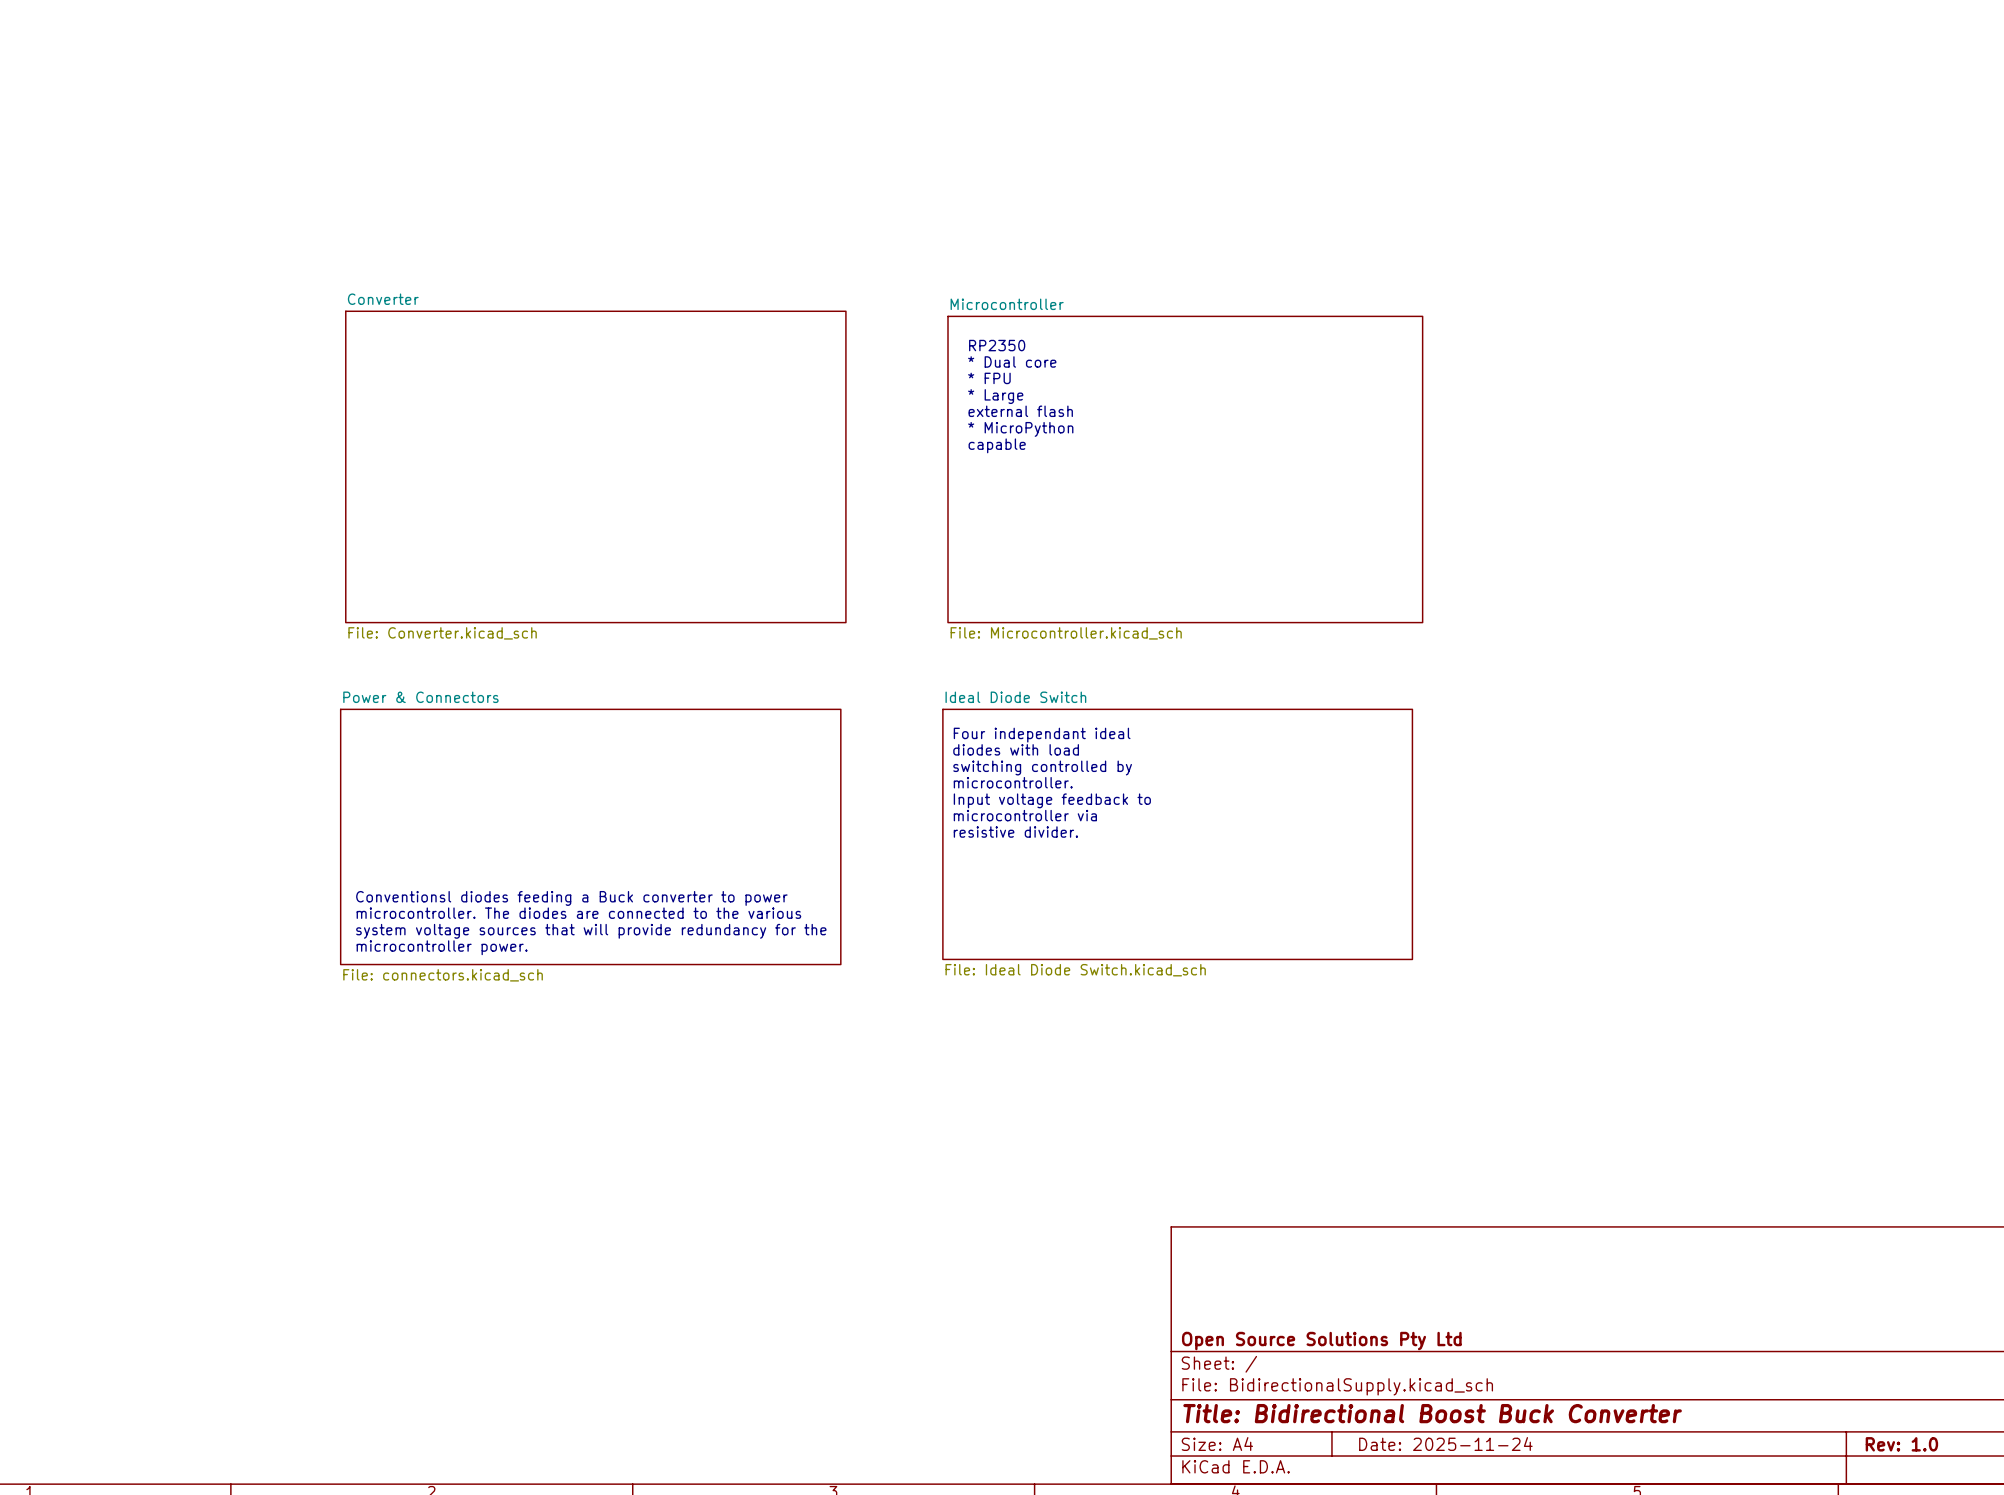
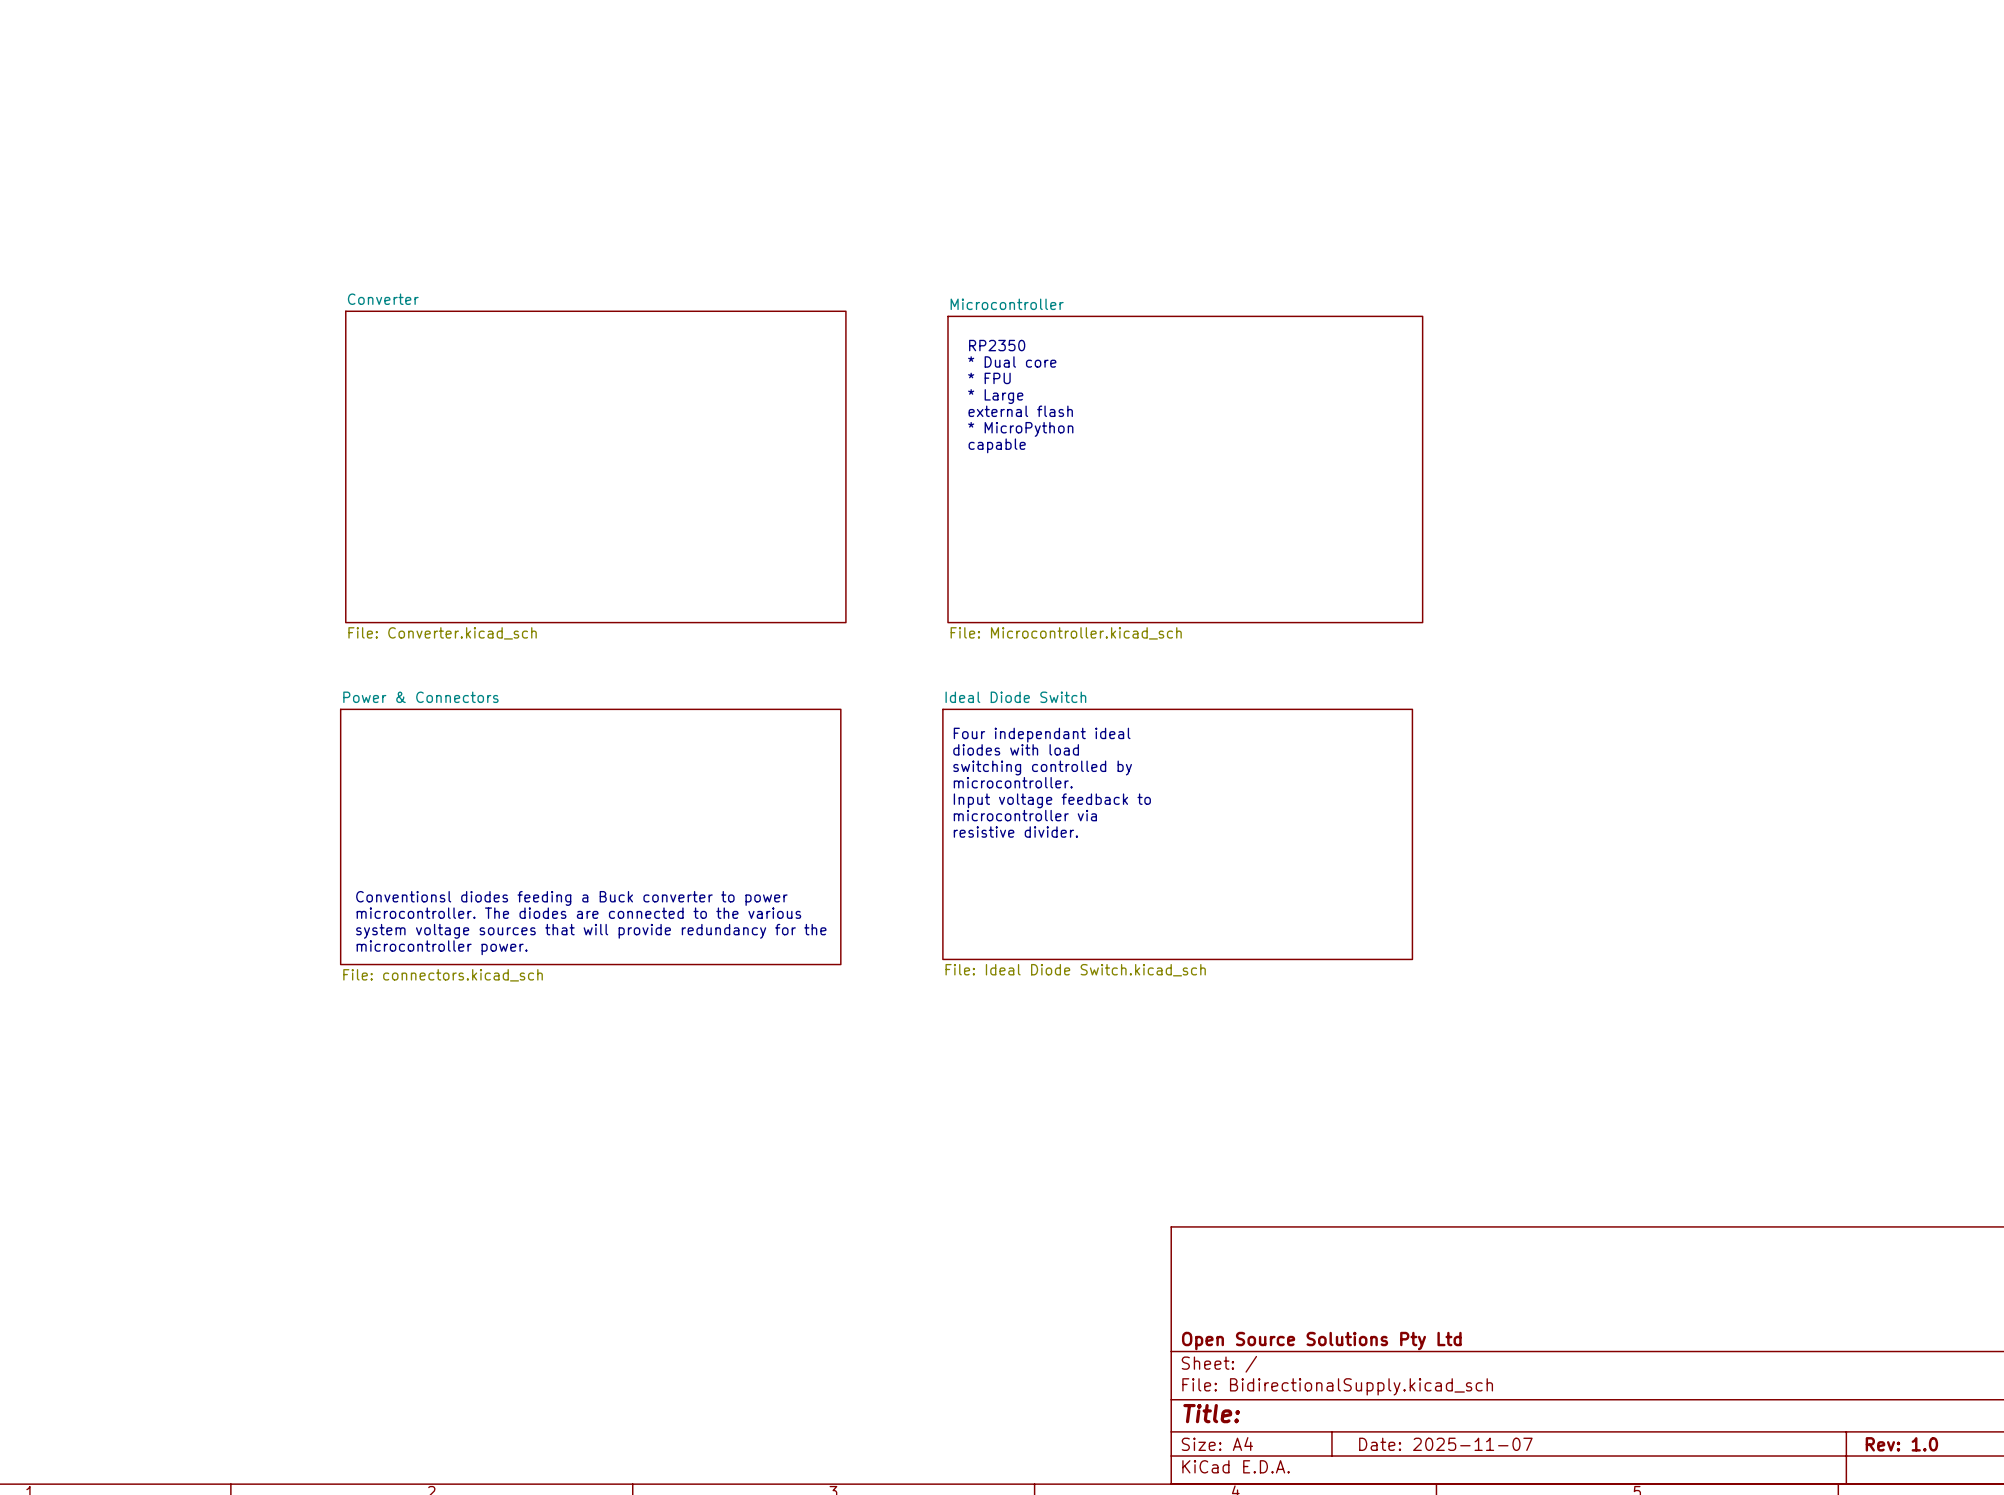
title block: Title: Bidirectional Boost Buck Converter (1432, 1413) -> Title: (1211, 1413)
title block: Date: 2025-11-24 (1445, 1444) -> Date: 2025-11-07 (1445, 1444)

